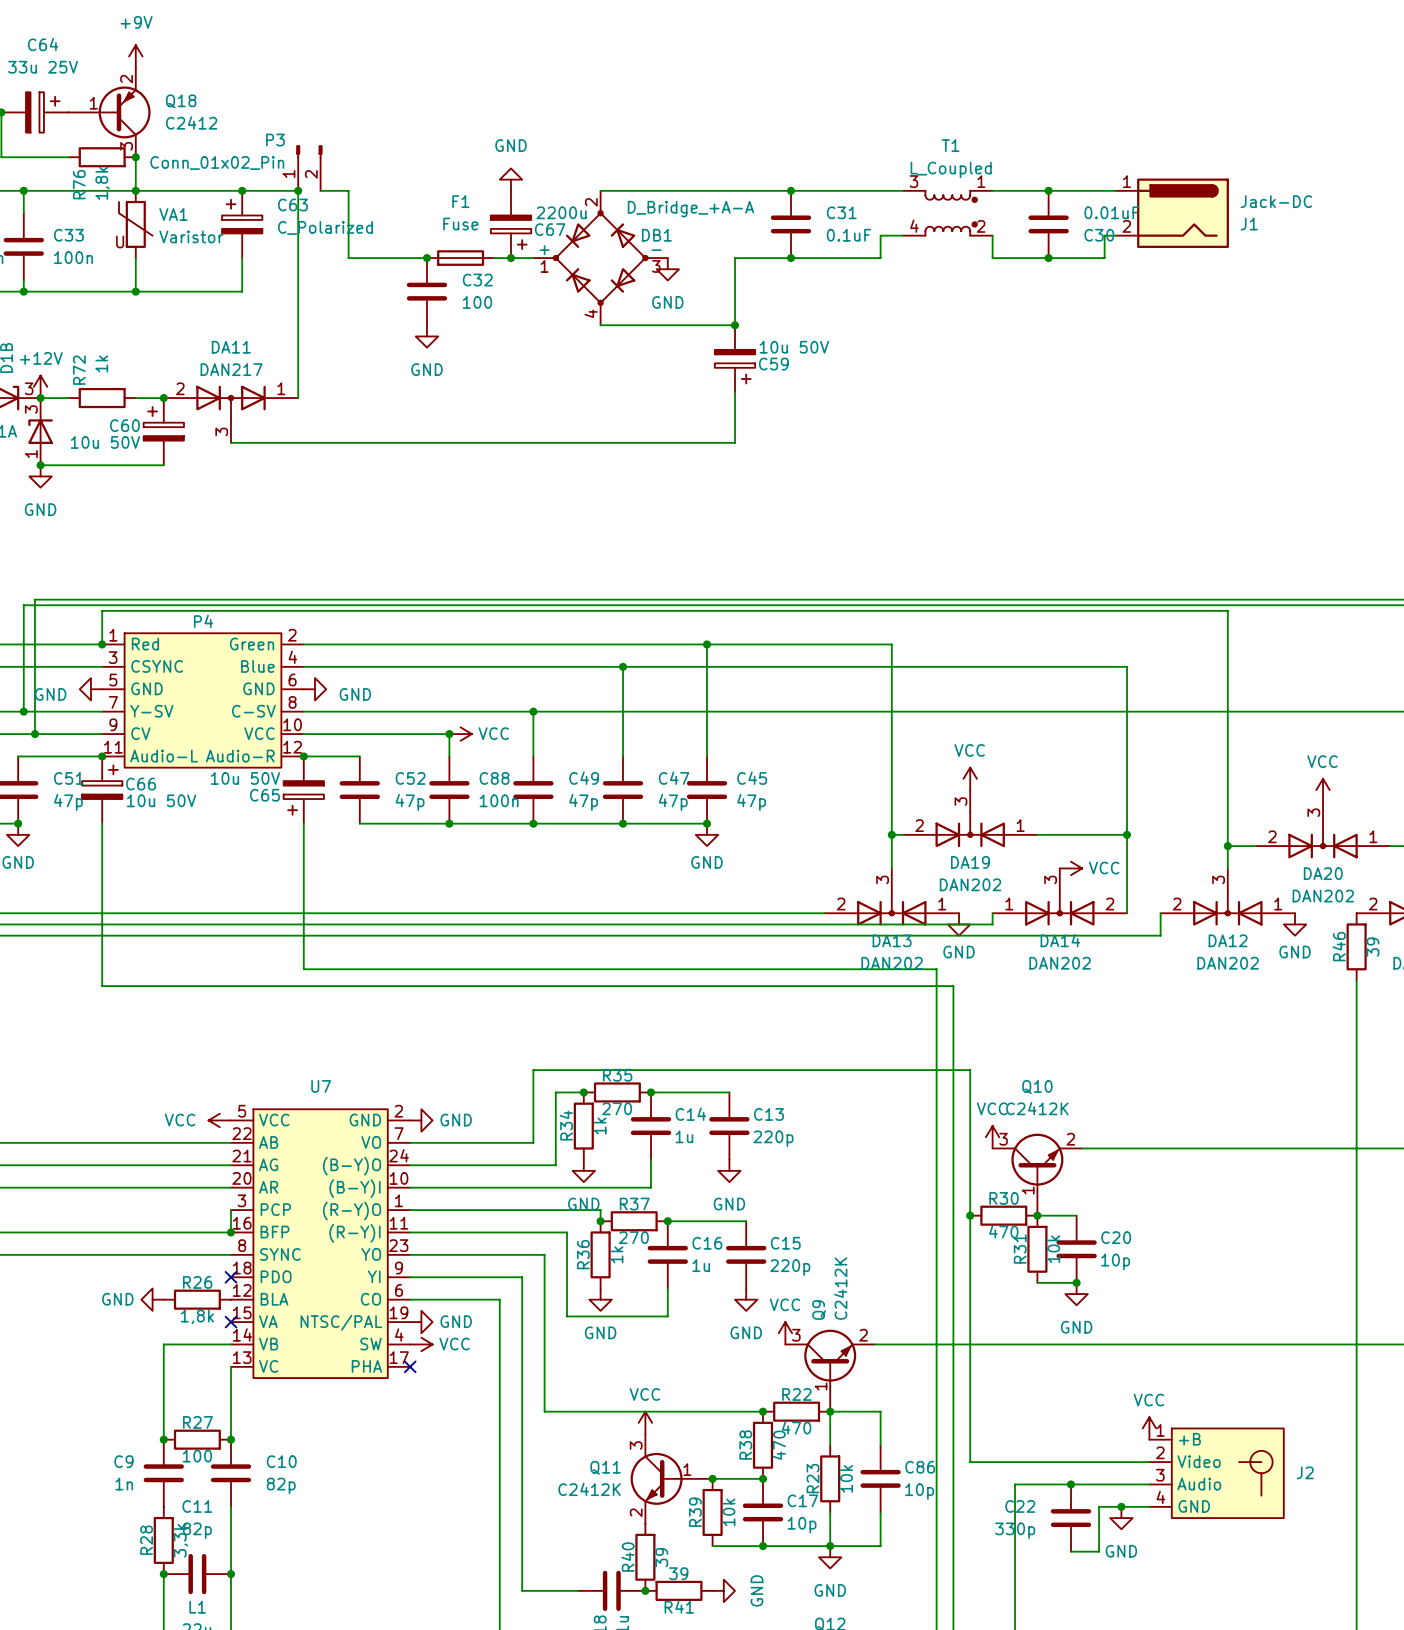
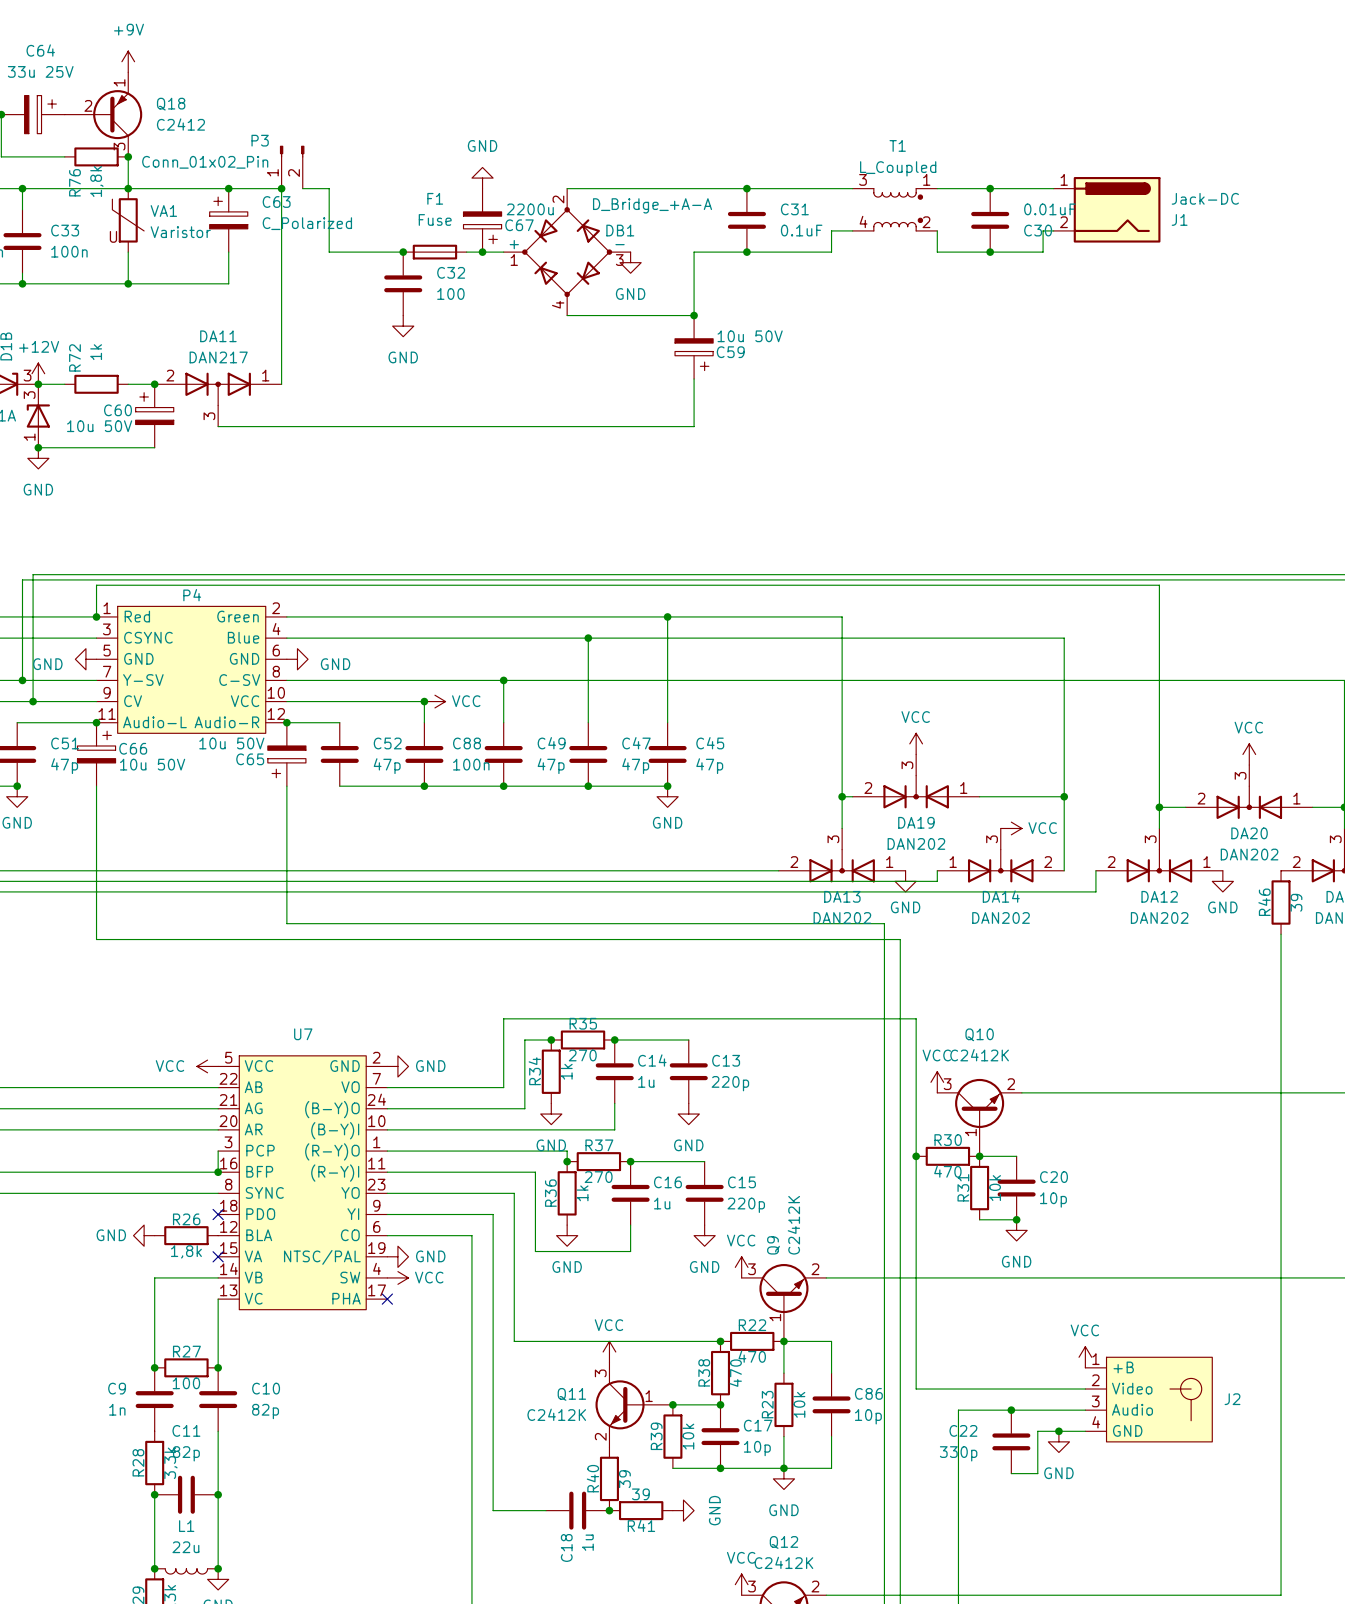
Q18 pin number: 2 (126, 79) -> 1 (119, 82)
Q18 pin number: 1 (93, 103) -> 2 (88, 105)

